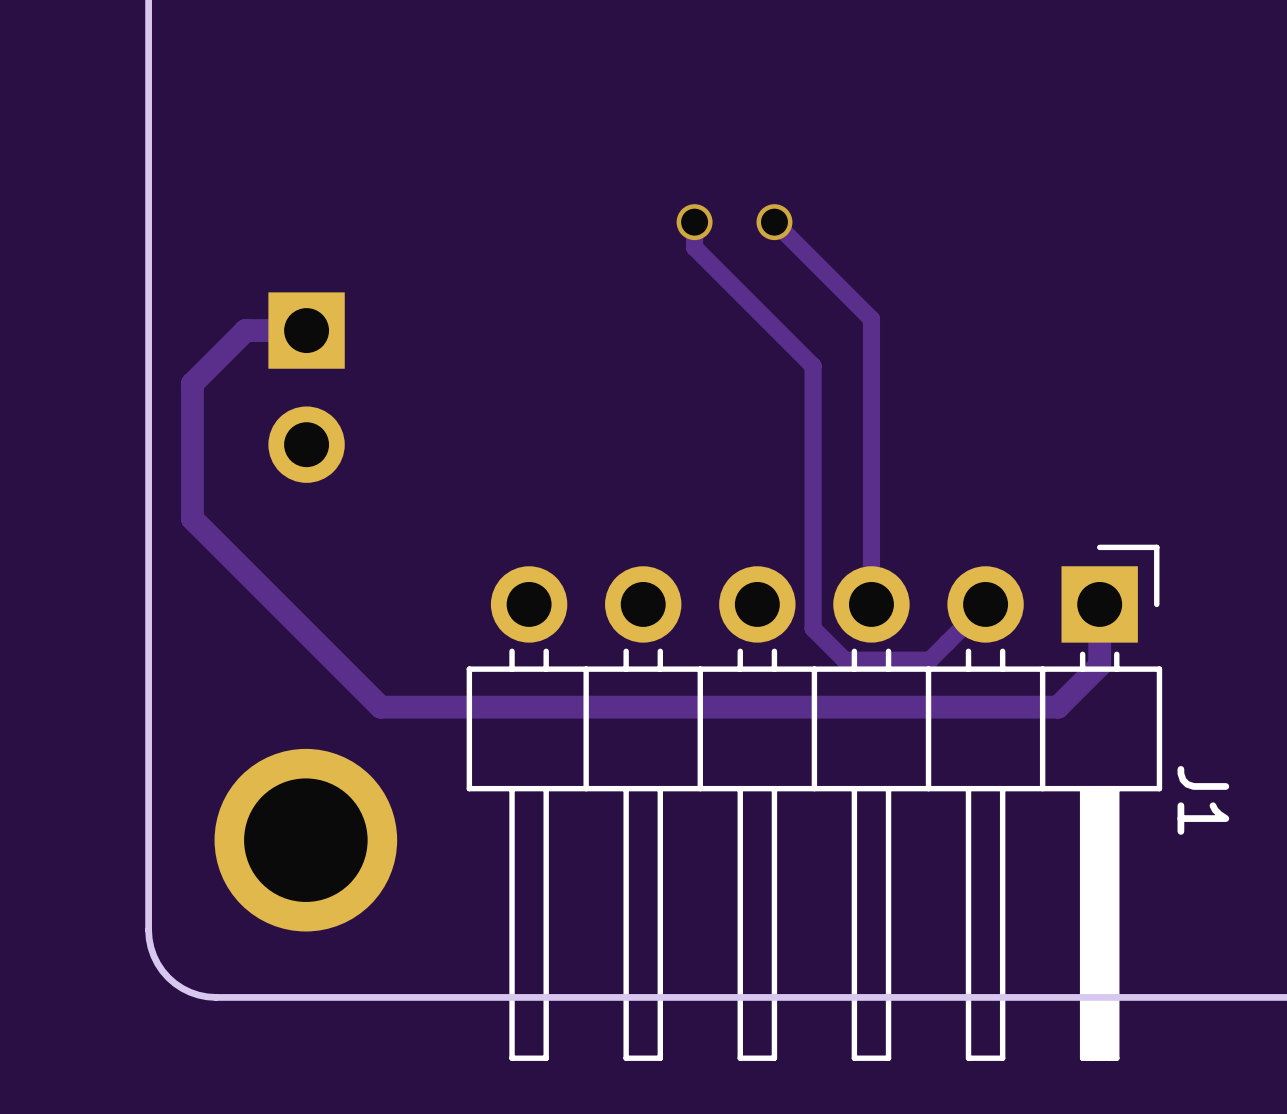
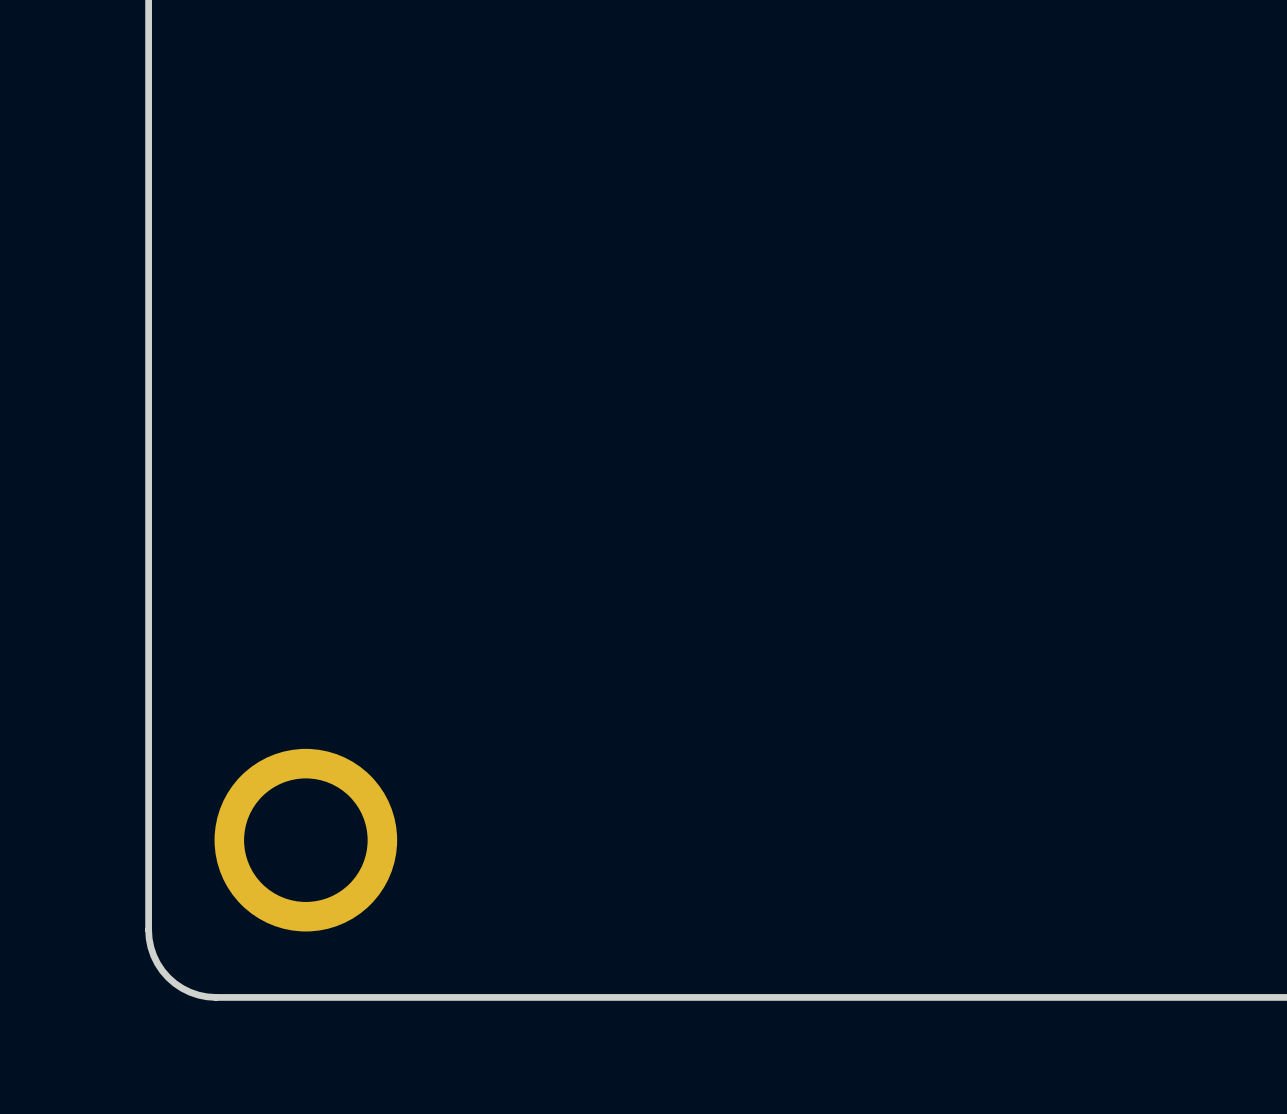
track: (694, 222) (694, 247) (813, 366) (813, 628) (844, 660) (929, 660) (985, 604) -> none
via: (694, 222) -> none
track: (774, 222) (871, 319) (871, 604) -> none
via: (774, 222) -> none
track: (306, 330) (245, 330) (192, 383) (192, 518) (380, 707) (1058, 707) (1099, 665) (1099, 604) -> none
part: (306, 387) -> none
J1: (814, 802) -> none

